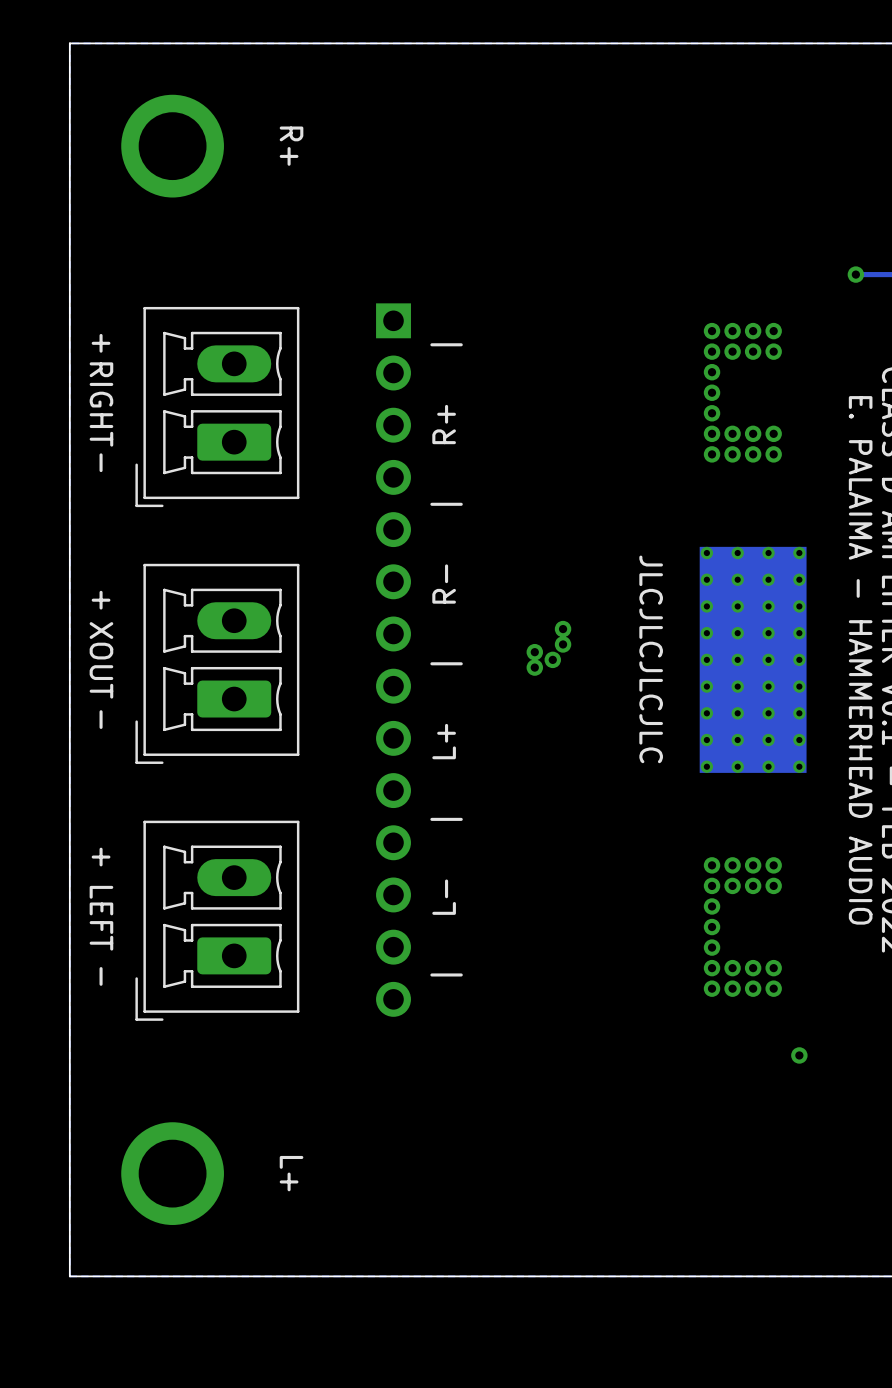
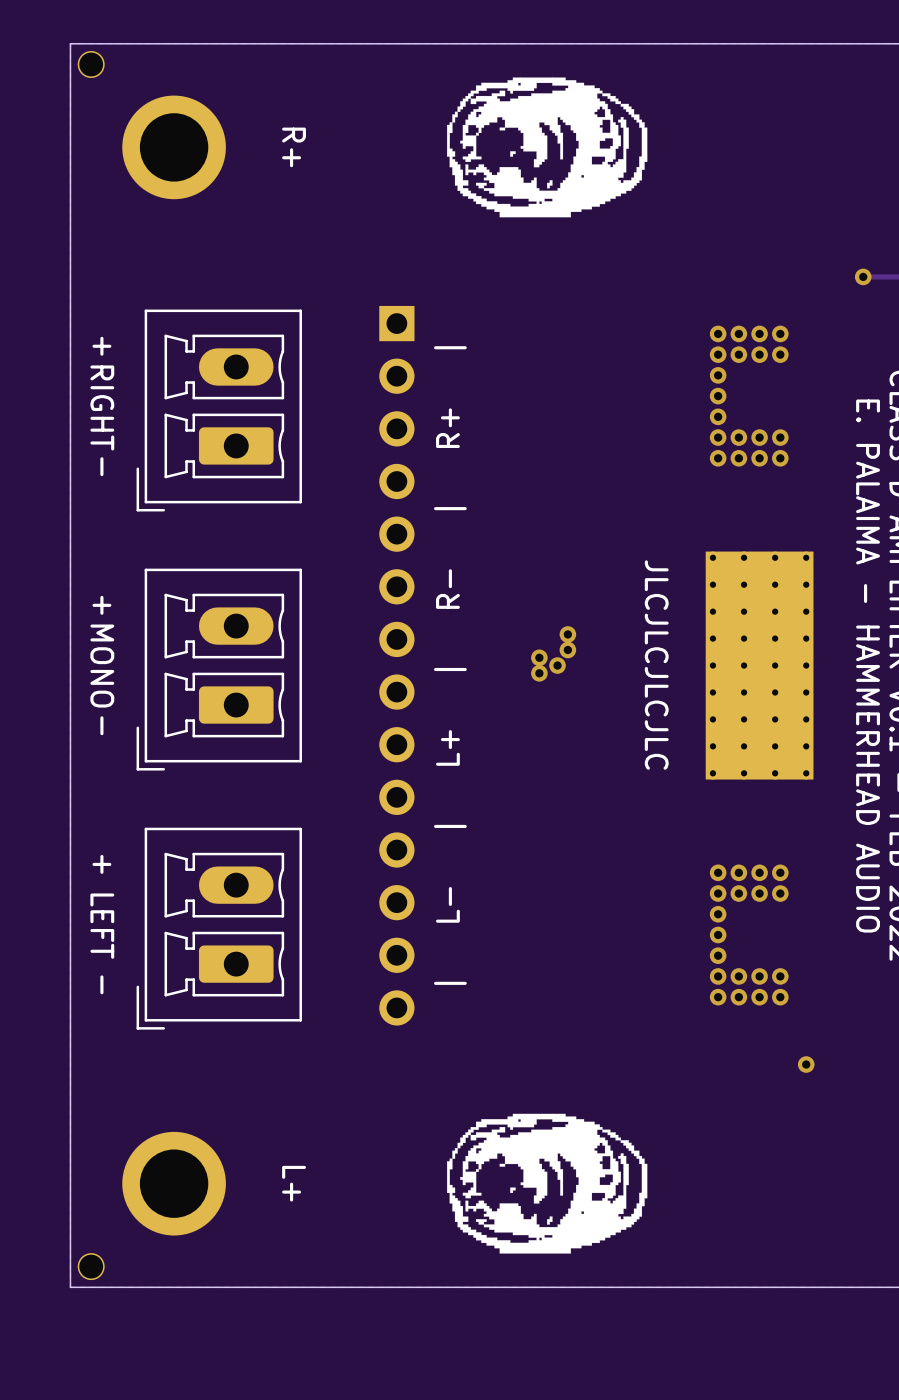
part: none -> (91, 64)
drawing: none -> [447, 77, 648, 218]
text: XOUT (101, 660) -> MONO (102, 666)
drawing: none -> [447, 1113, 648, 1254]
part: none -> (91, 1266)

